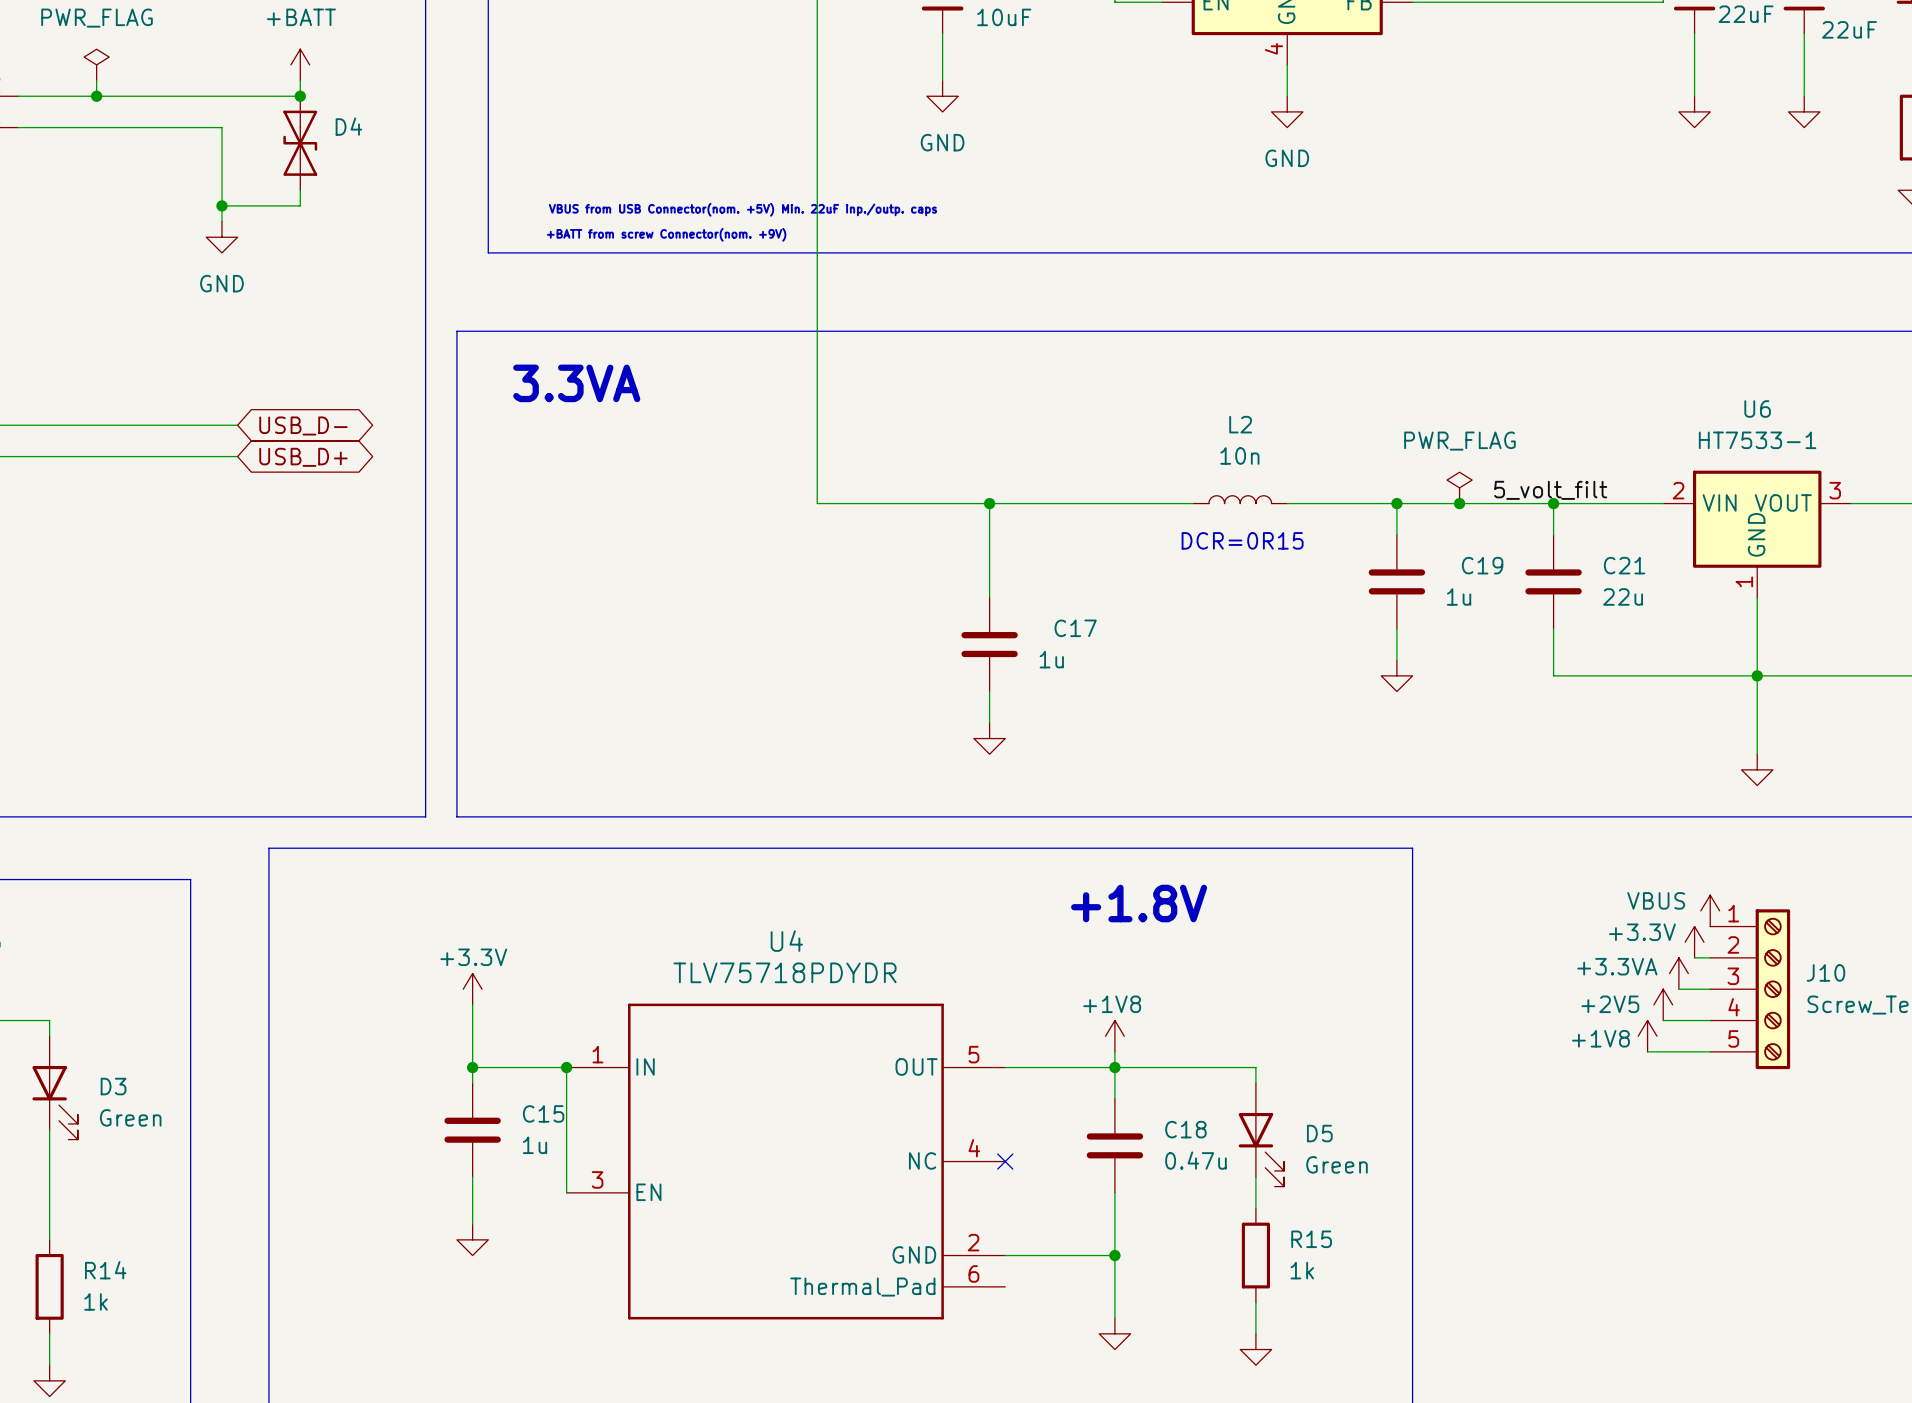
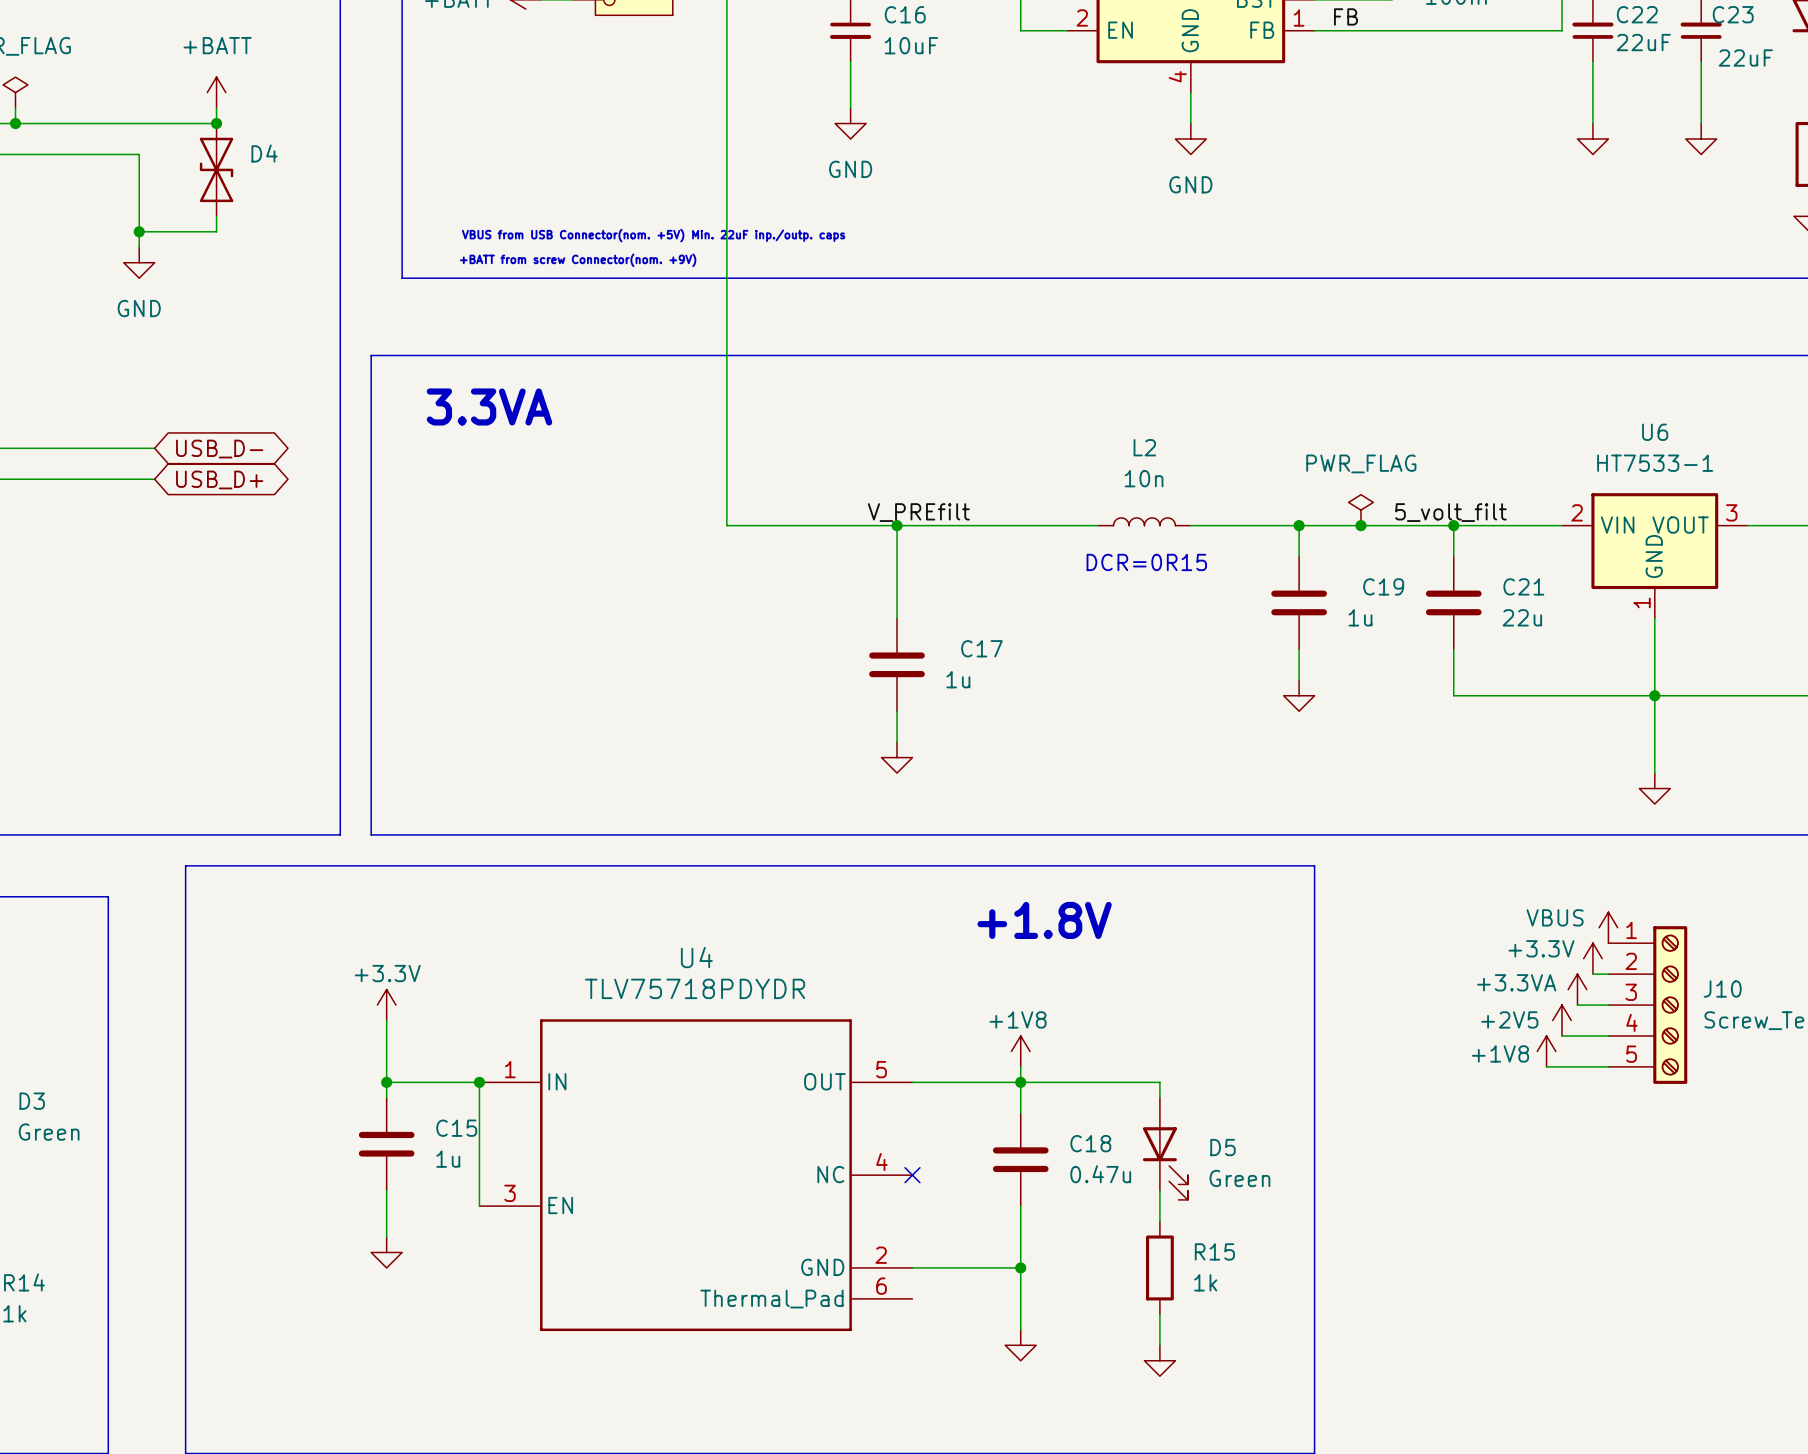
label: none -> V_PREfilt (918, 512)

